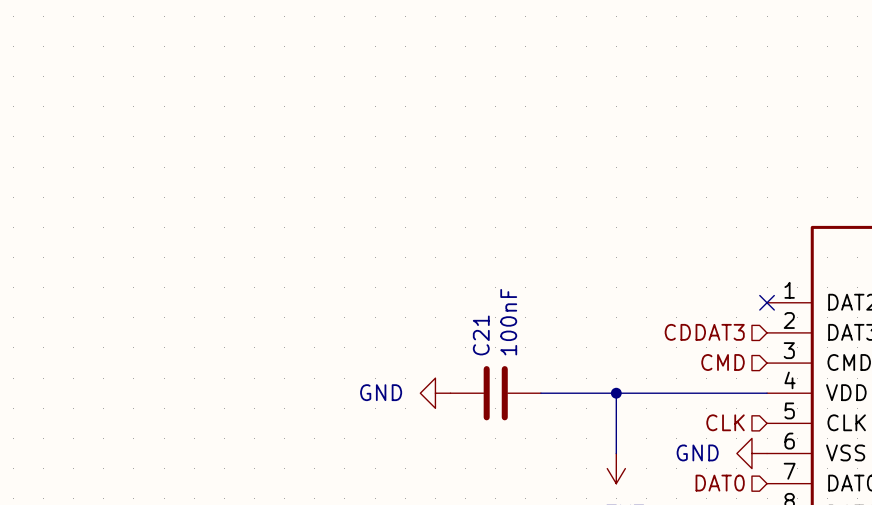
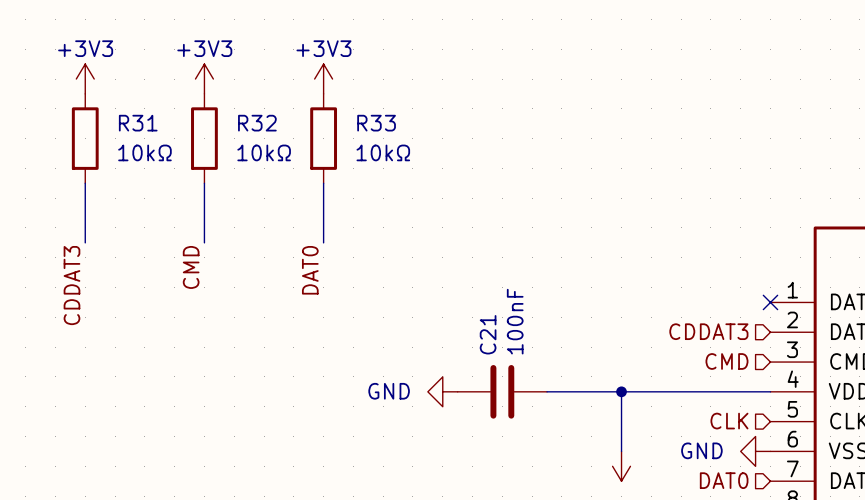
power symbol: none -> +3V3 (85, 79)
power symbol: none -> +3V3 (204, 79)
power symbol: none -> +3V3 (323, 79)
R31: none -> 10kΩ (85, 138)
R32: none -> 10kΩ (204, 138)
R33: none -> 10kΩ (323, 138)
wire: none -> (85, 183) (85, 242)
wire: none -> (204, 183) (204, 242)
wire: none -> (323, 183) (323, 242)
label: none -> CMD (191, 267)
label: none -> DAT0 (310, 270)
label: none -> CDDAT3 (71, 285)

